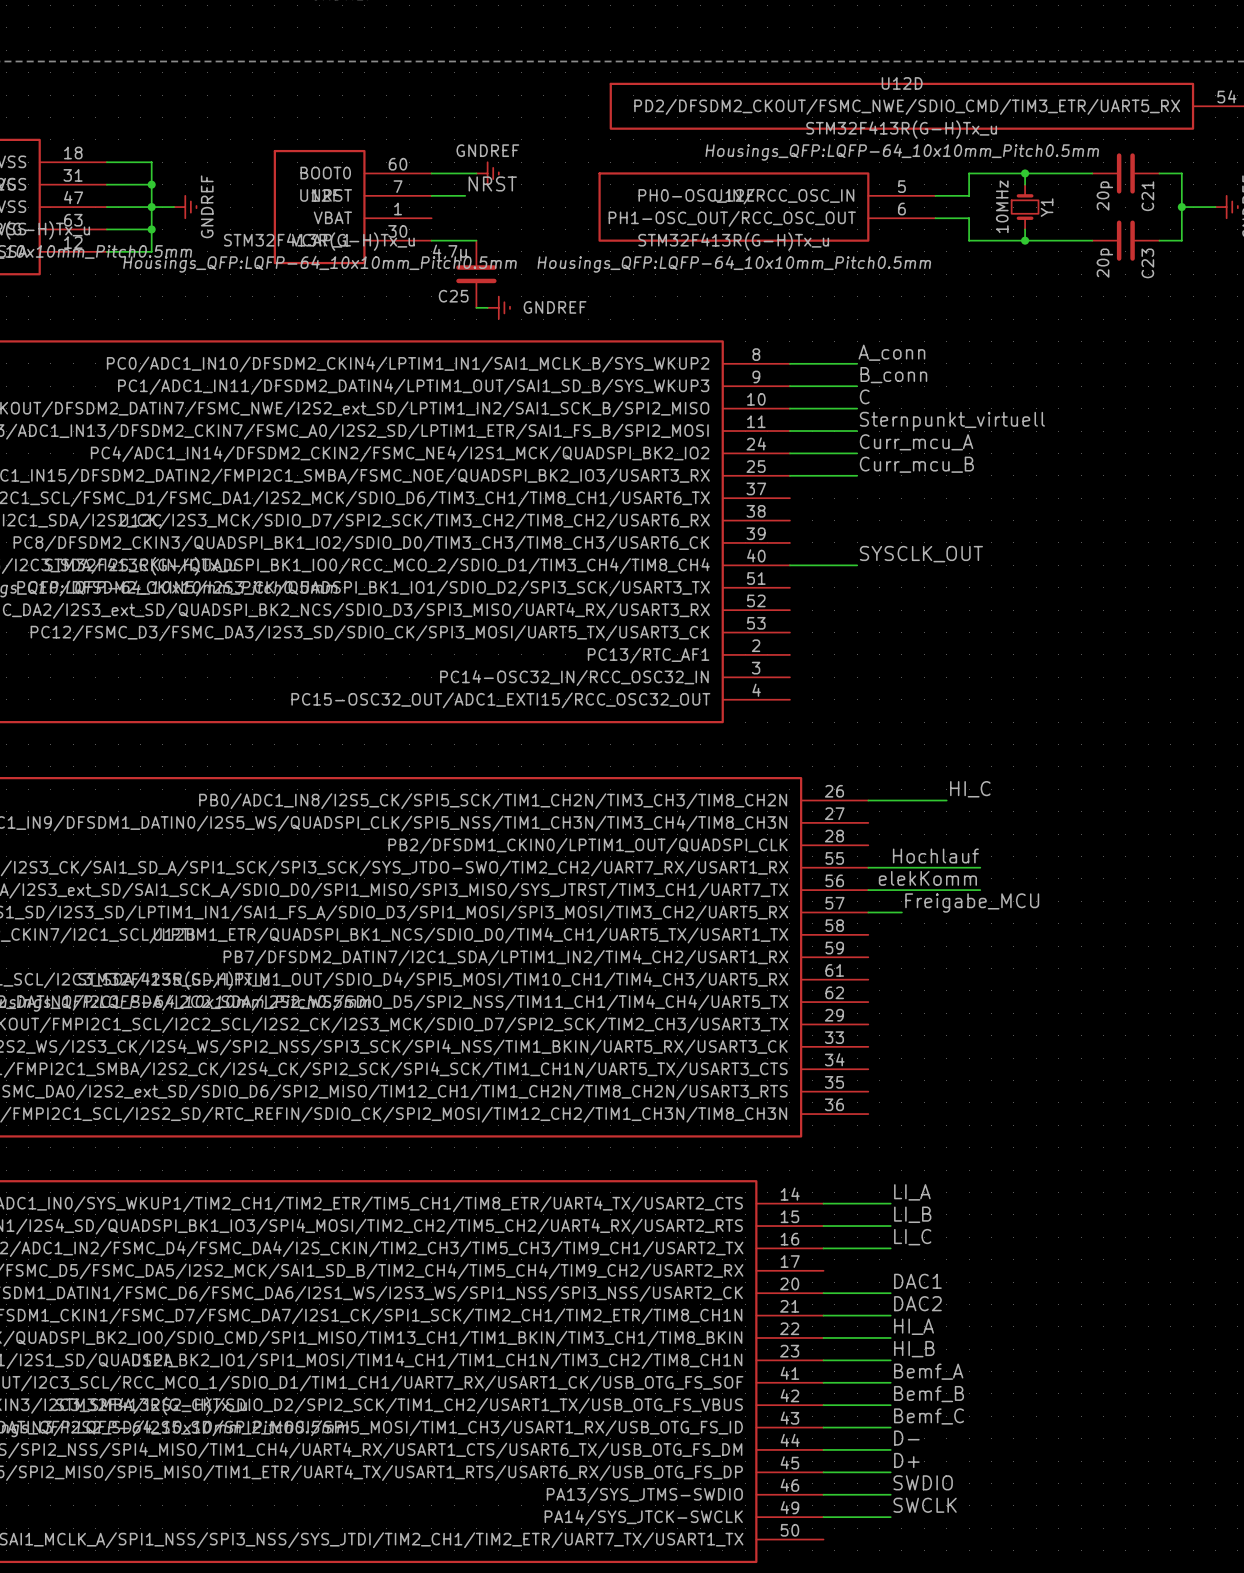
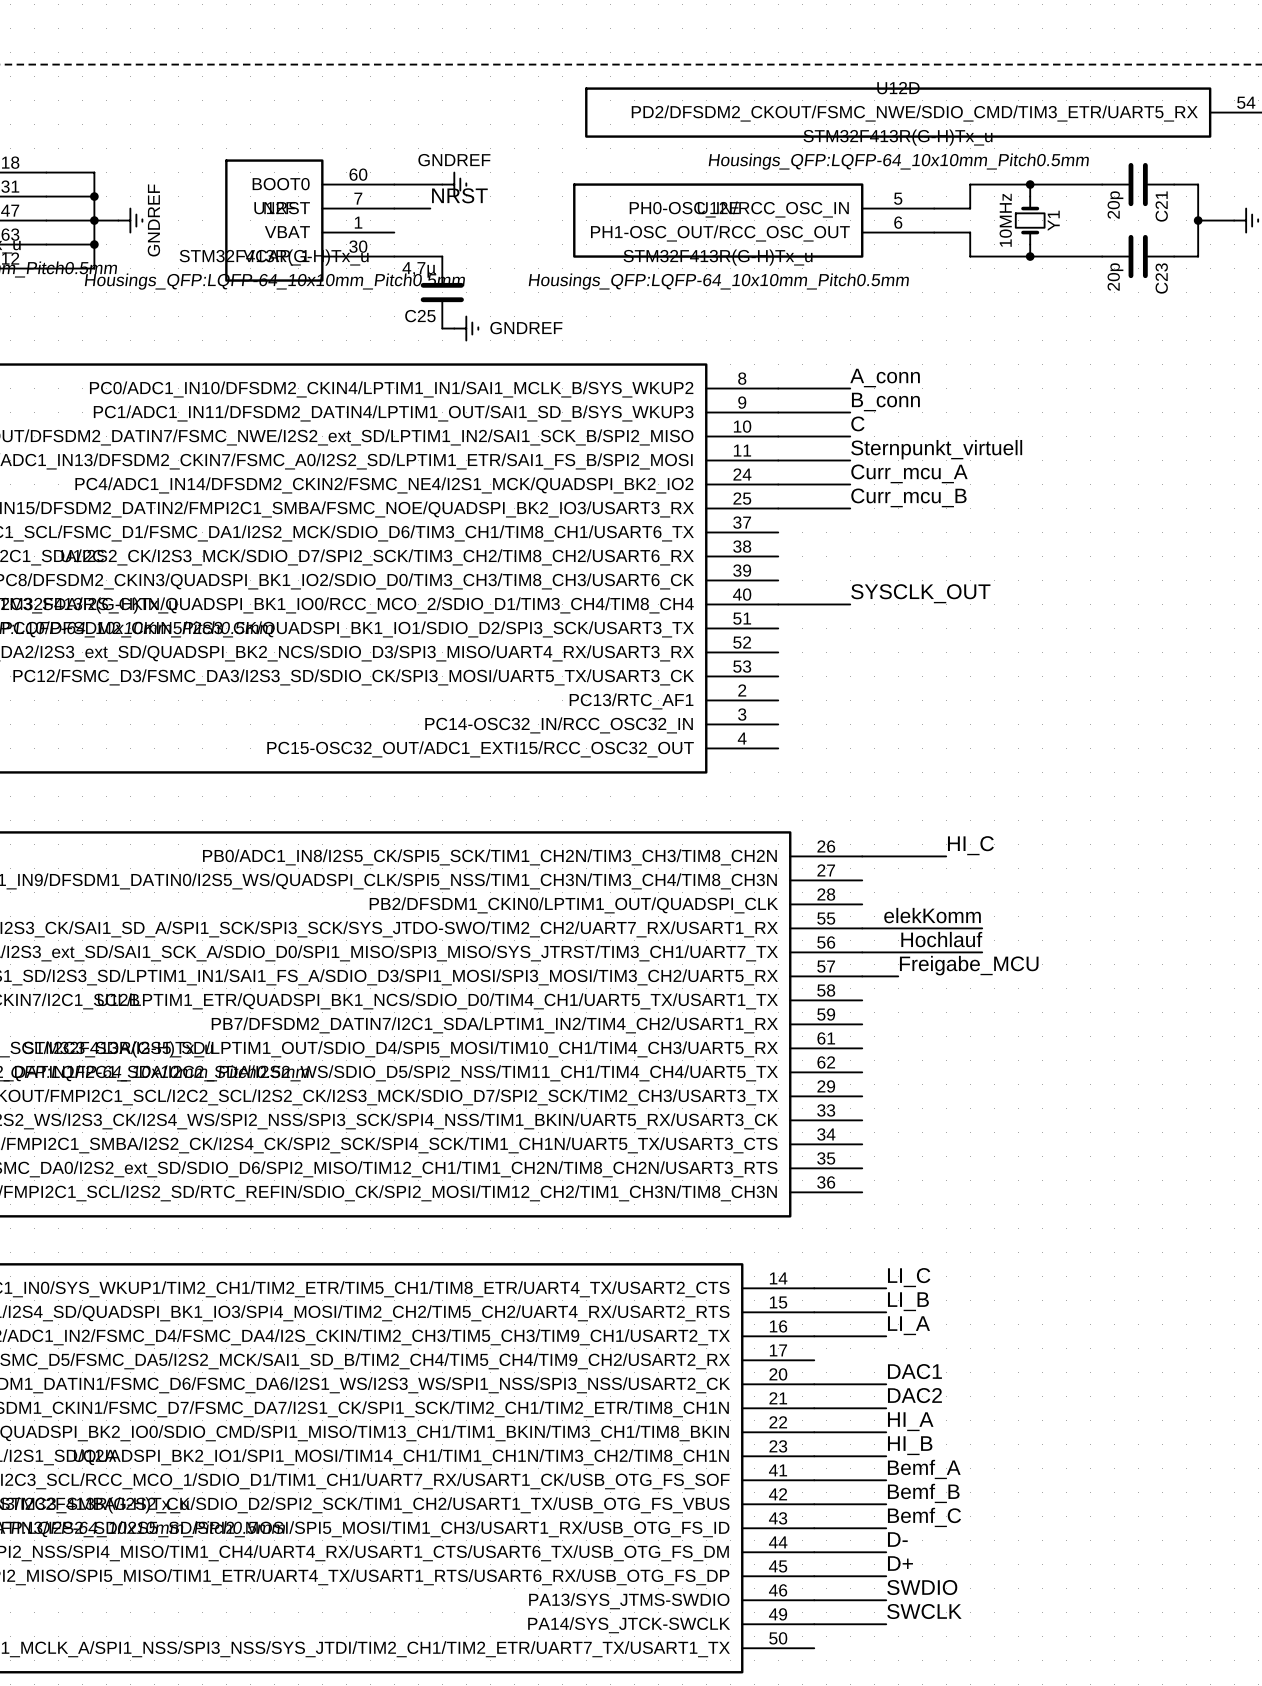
label: Hochlauf (935, 855) -> elekKomm (932, 915)
label: elekKomm (927, 878) -> Hochlauf (941, 939)
label: LI_A (912, 1192) -> LI_C (909, 1277)
label: LI_C (912, 1237) -> LI_A (908, 1325)

